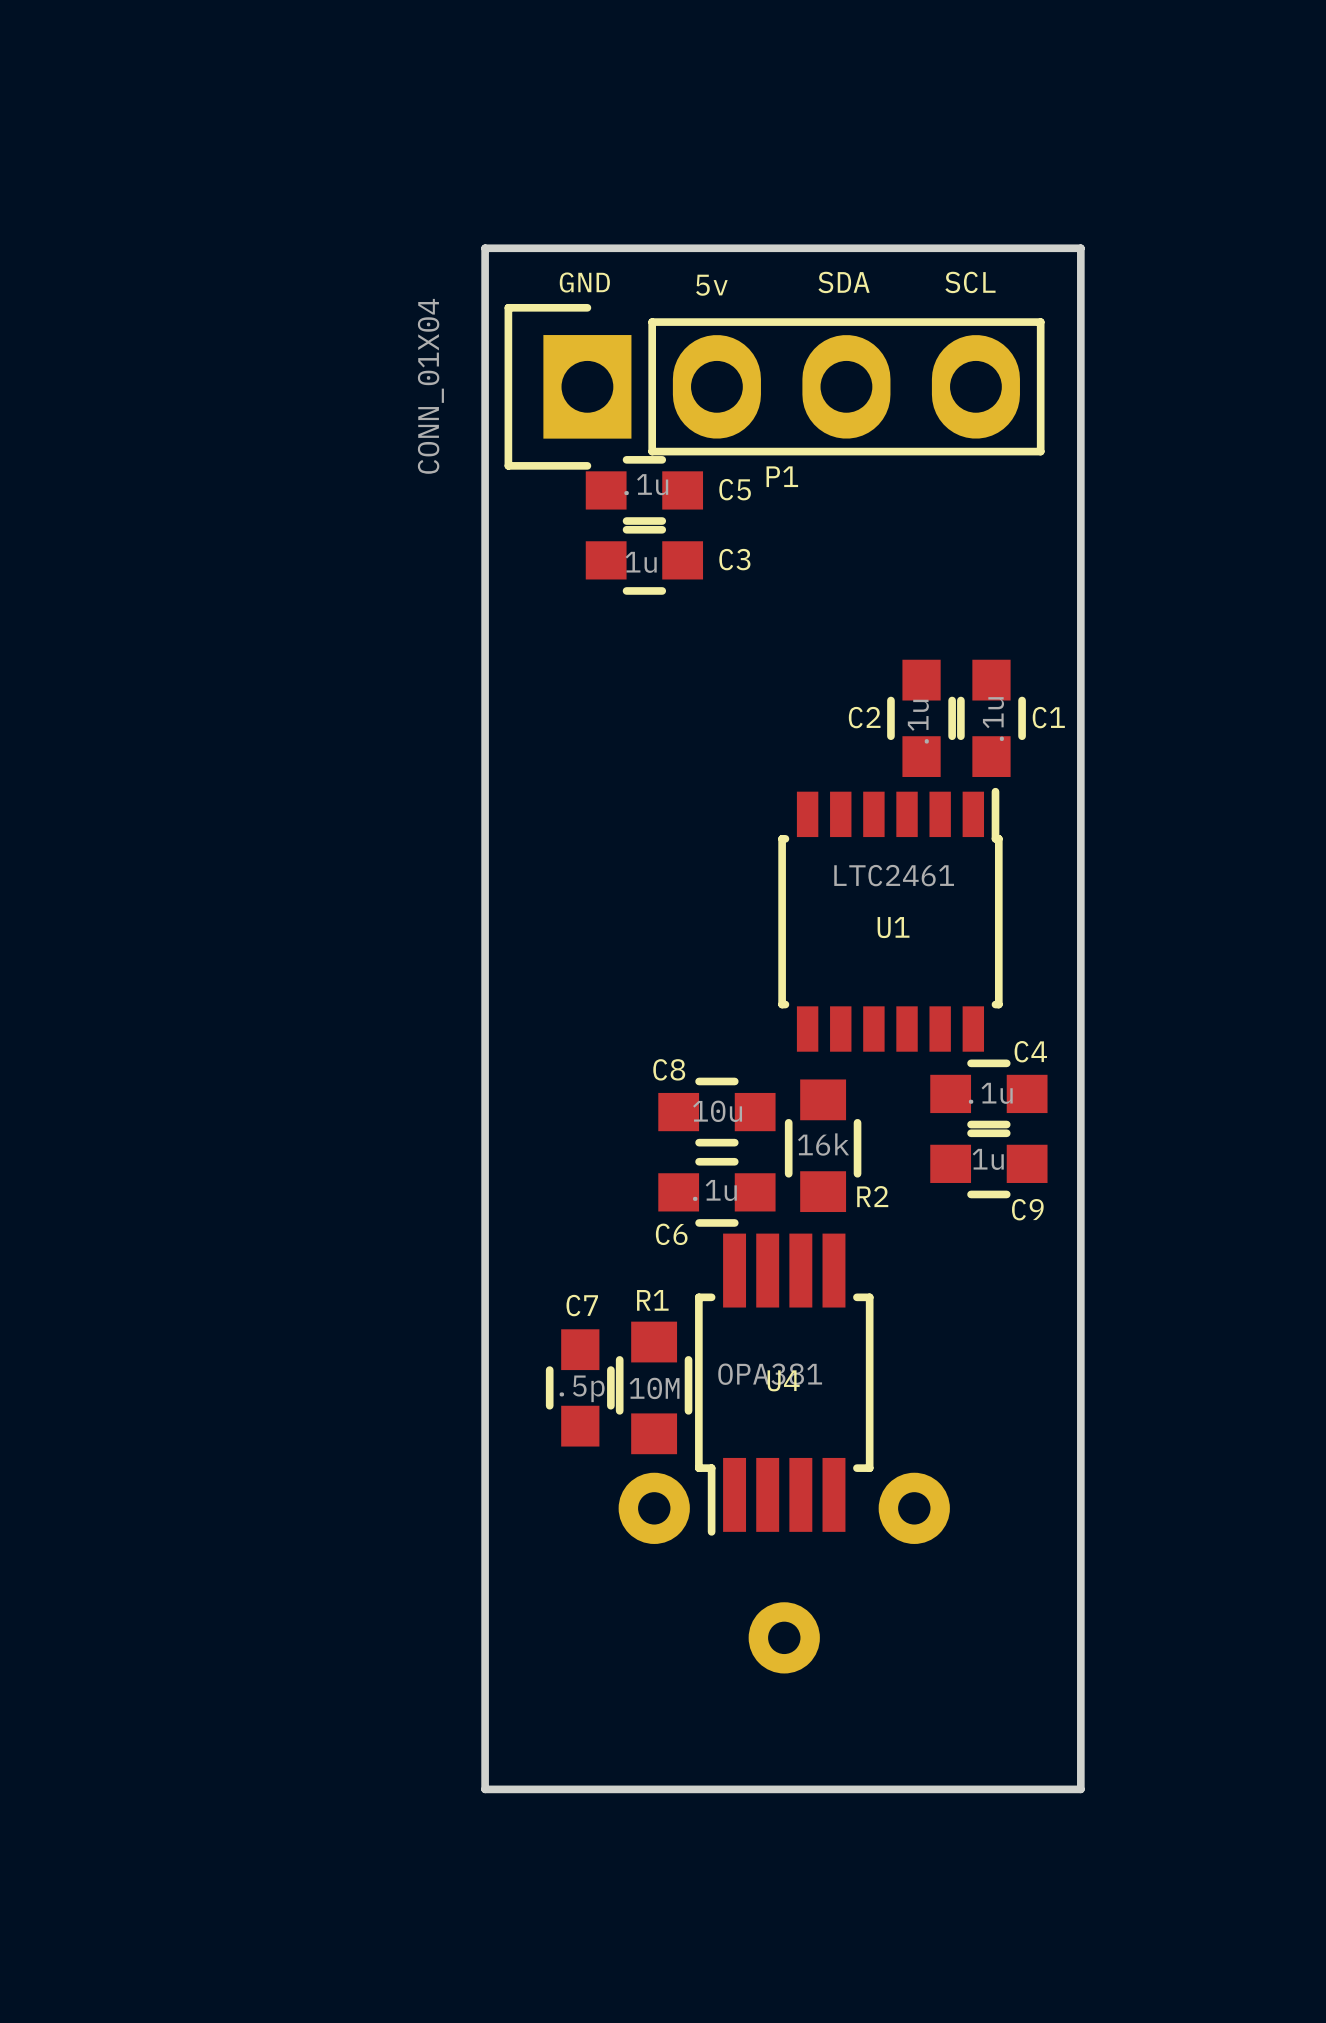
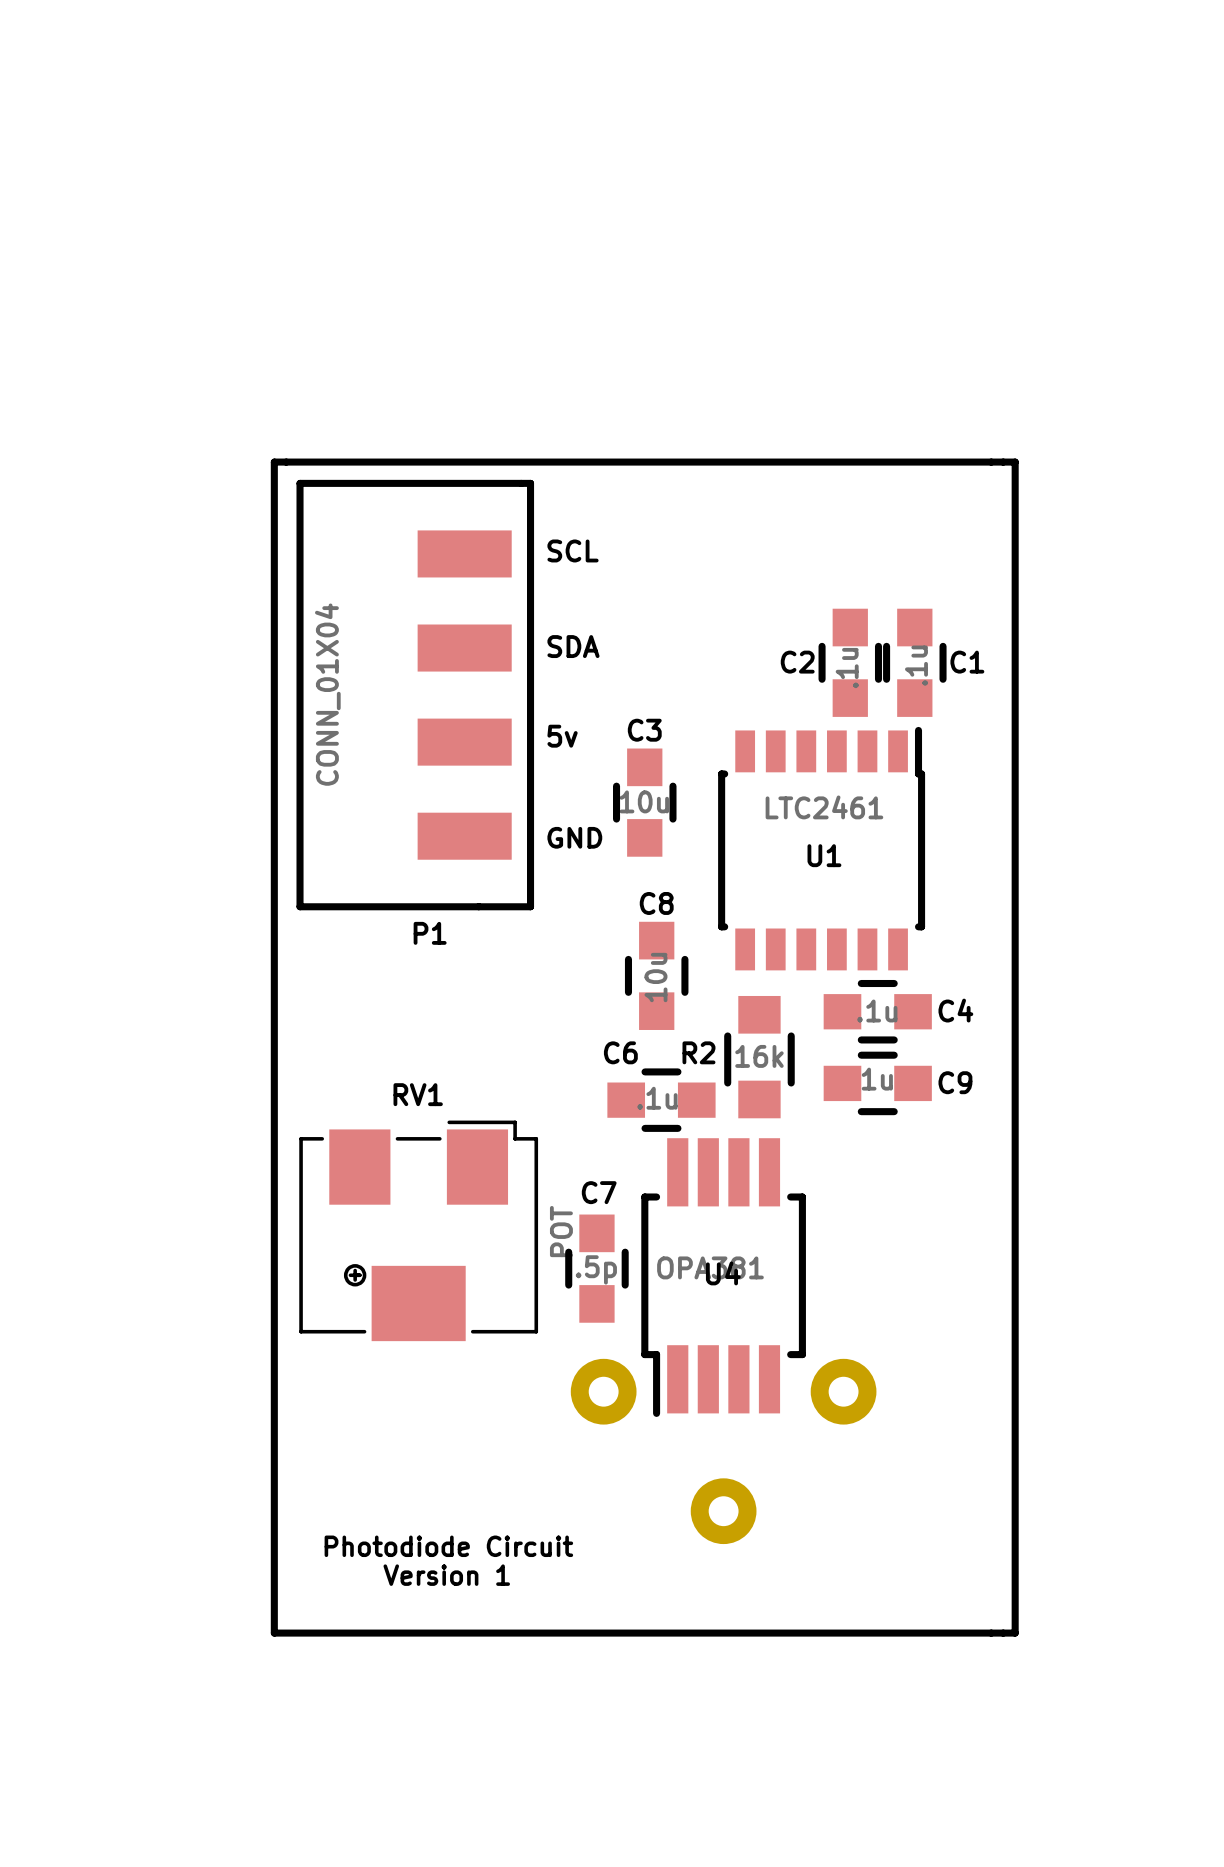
board edge: (485, 248) (485, 1789) (1080, 1789) (1080, 248) (485, 248) -> (274, 462) (274, 1633) (1015, 1633) (1015, 462) (274, 462)
text position: GND (584, 282) -> GND (574, 837)
text position: SDA (844, 282) -> SDA (573, 646)
text position: SCL (970, 282) -> SCL (573, 550)
text position: 5v (711, 285) -> 5v (562, 736)
P1 footprint: [504, 303, 1045, 470] -> [296, 479, 535, 911]
P1 value position: CONN_01X04 (430, 386) -> CONN_01X04 (327, 694)
P1 name position: P1 (782, 476) -> P1 (430, 933)
C5: .1u (644, 490) -> none
C3 name position: C3 (734, 559) -> C3 (644, 730)
C3 rotation: 0° (644, 560) -> 90° clockwise (644, 802)
C3 position: (644, 560) -> (644, 802)
C3 value: 1u (641, 562) -> 10u (644, 801)
C4 name position: C4 (1030, 1051) -> C4 (955, 1010)
C4 position: (988, 1093) -> (877, 1011)
C8 rotation: 0° (716, 1112) -> 90° clockwise (656, 975)
C9 position: (988, 1163) -> (877, 1083)
R2 name position: R2 (872, 1196) -> R2 (698, 1052)
C9 name position: C9 (1027, 1209) -> C9 (955, 1082)
C6 name position: C6 (671, 1234) -> C6 (620, 1052)
RV1: none -> POT (418, 1230)
C7 position: (580, 1387) -> (596, 1268)
R1: 10M (654, 1387) -> none
text: none -> Photodiode Circuit (448, 1546)
text: none -> Version 1 (446, 1575)

